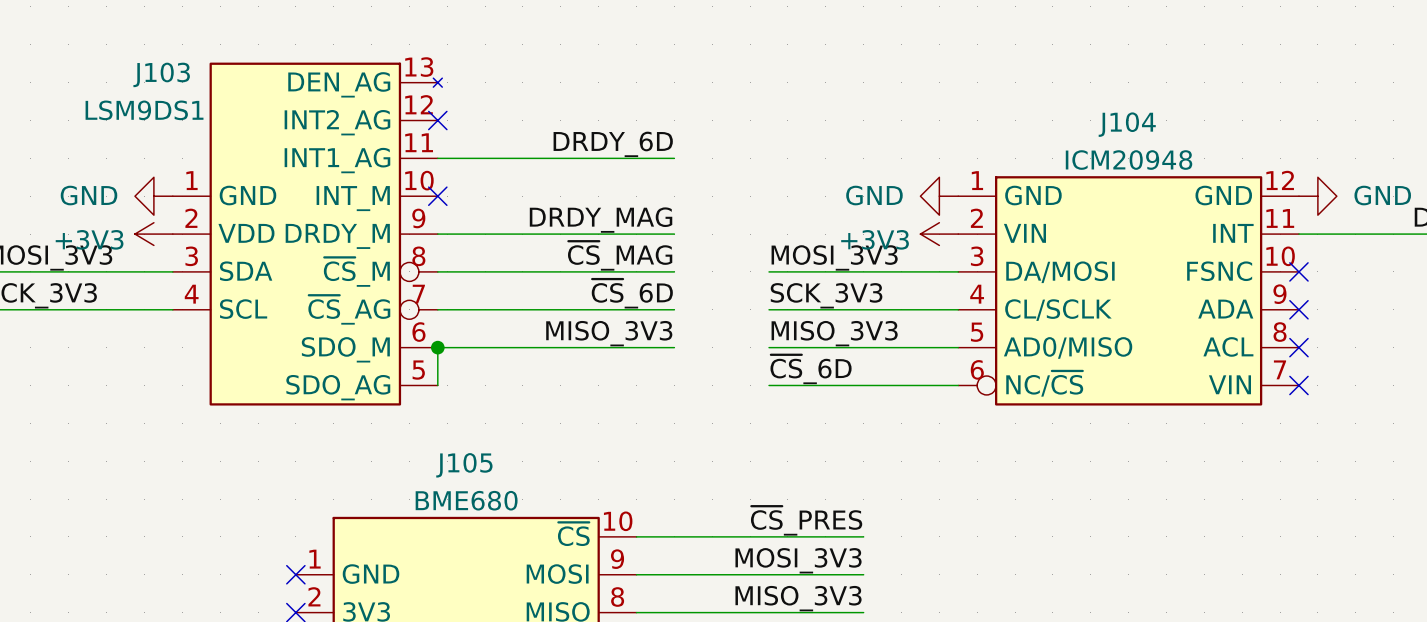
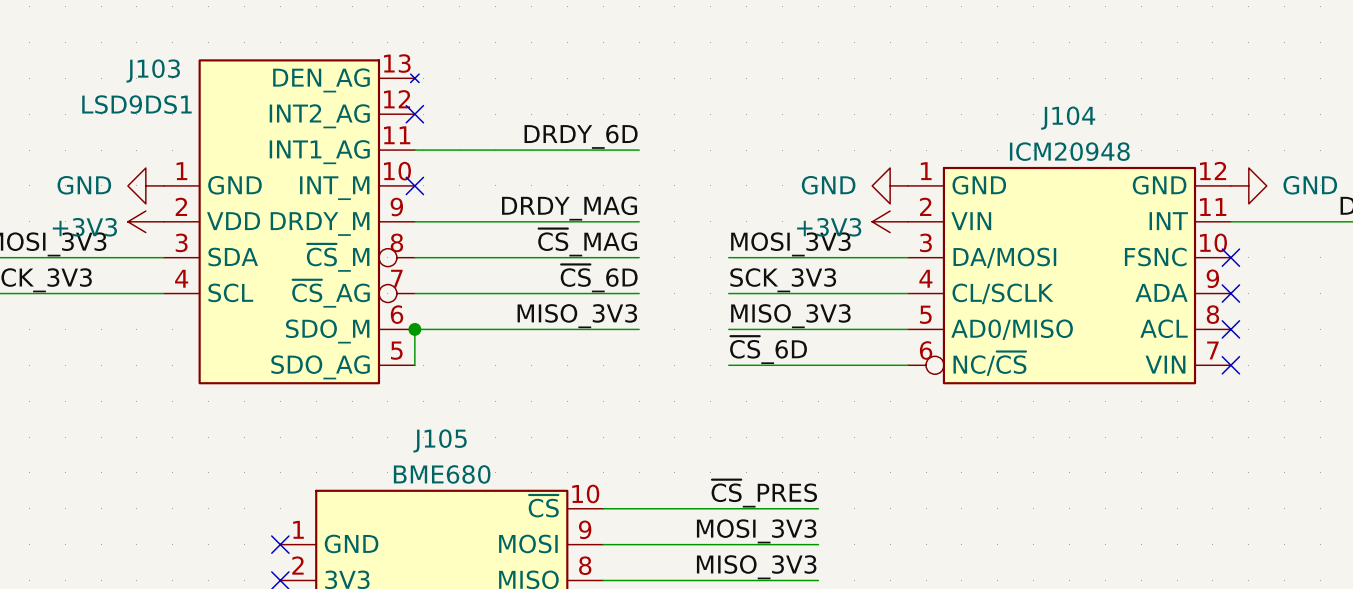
J103 value: LSM9DS1 (144, 110) -> LSD9DS1 (136, 104)

